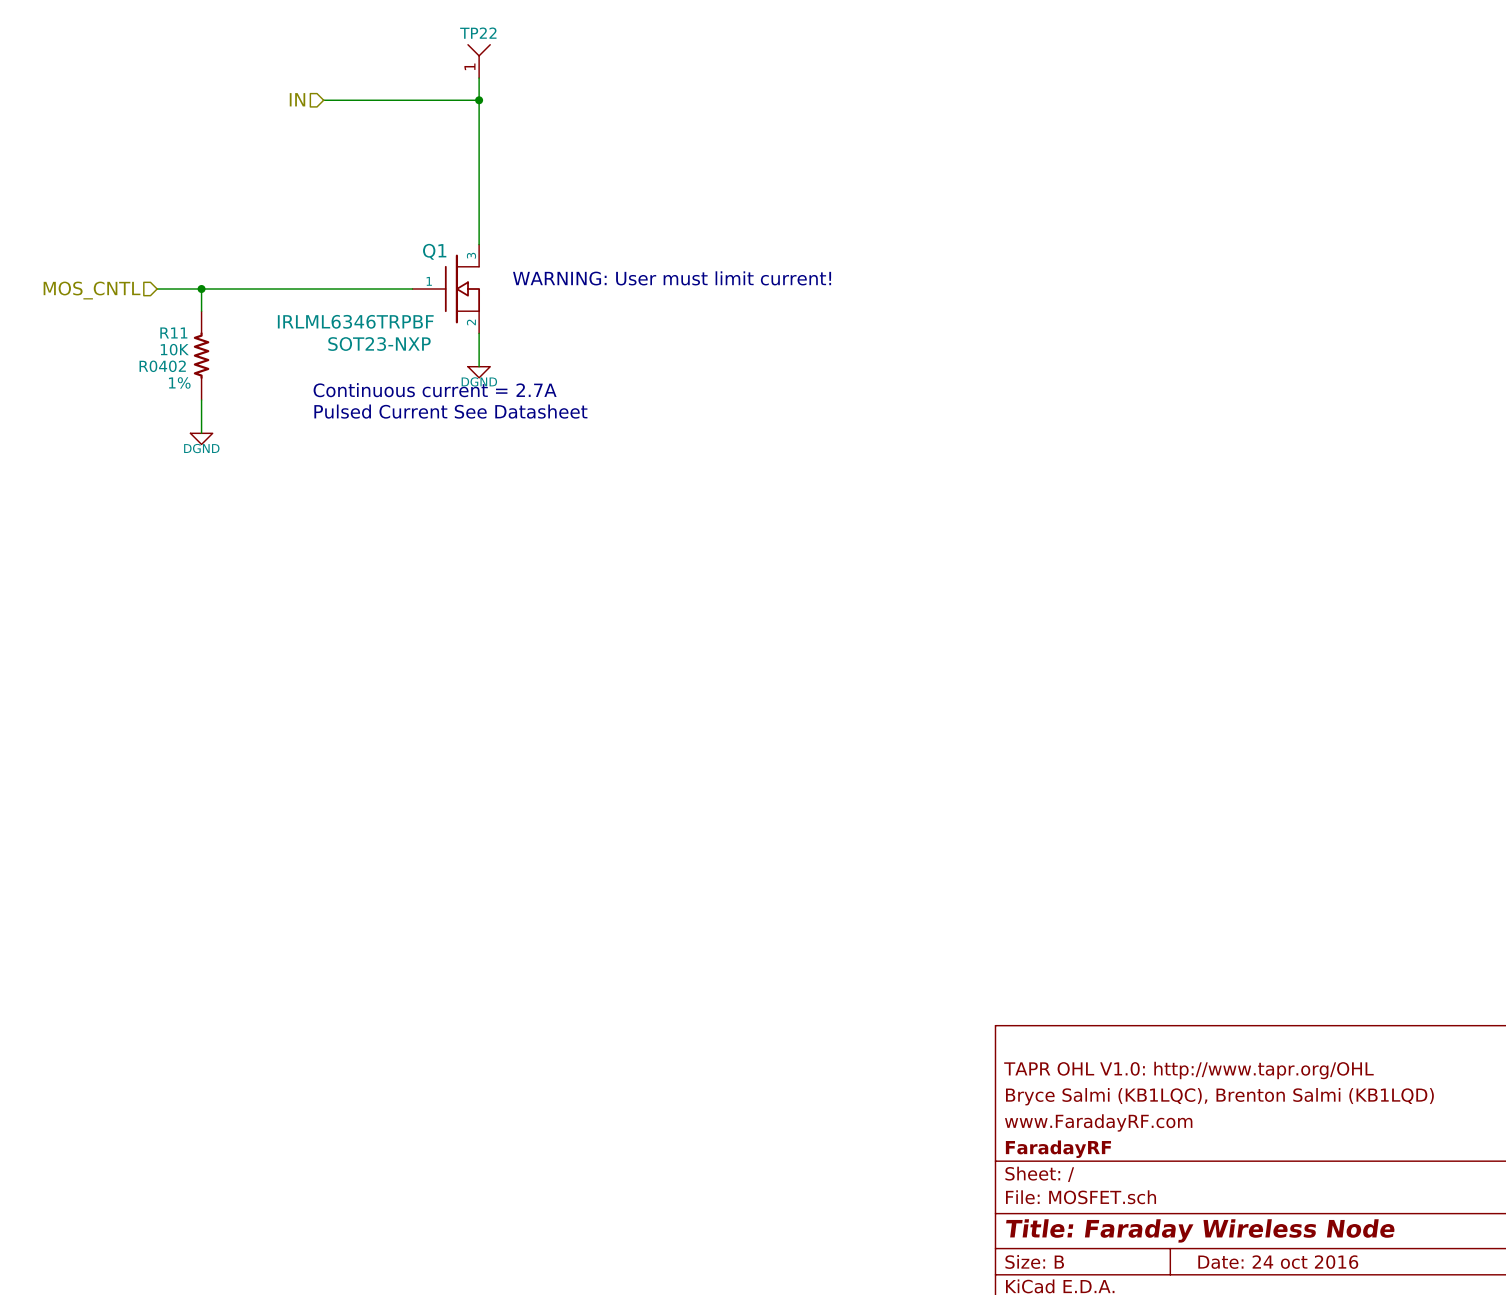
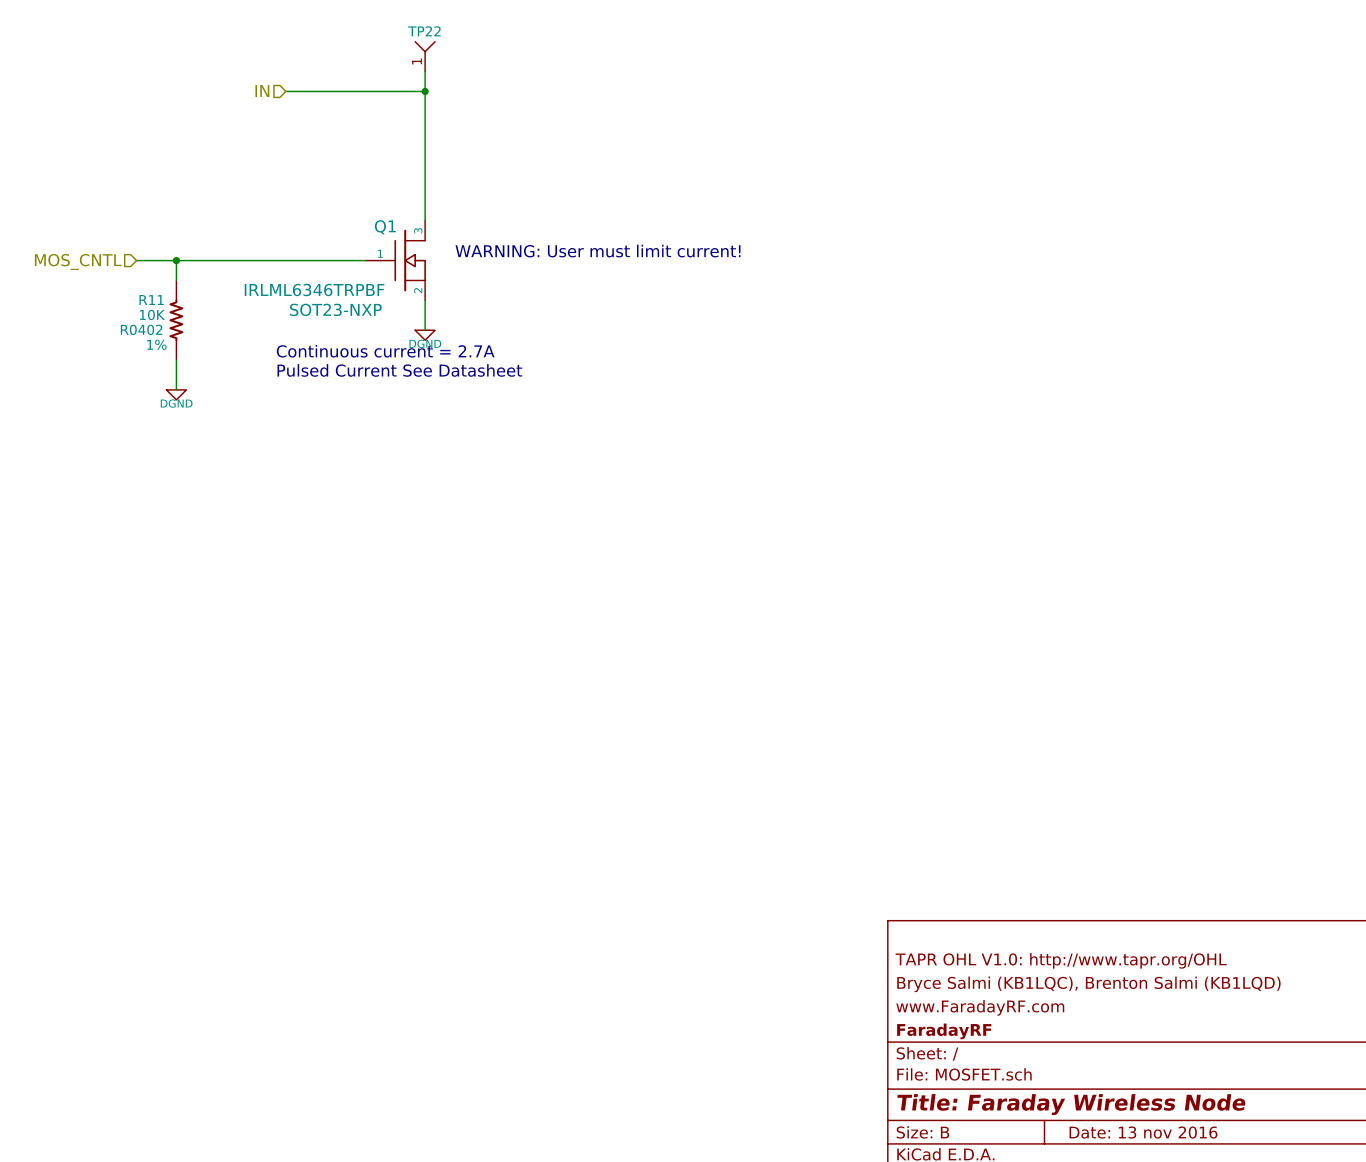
title block: Date: 24 oct 2016 (1278, 1262) -> Date: 13 nov 2016 (1143, 1132)

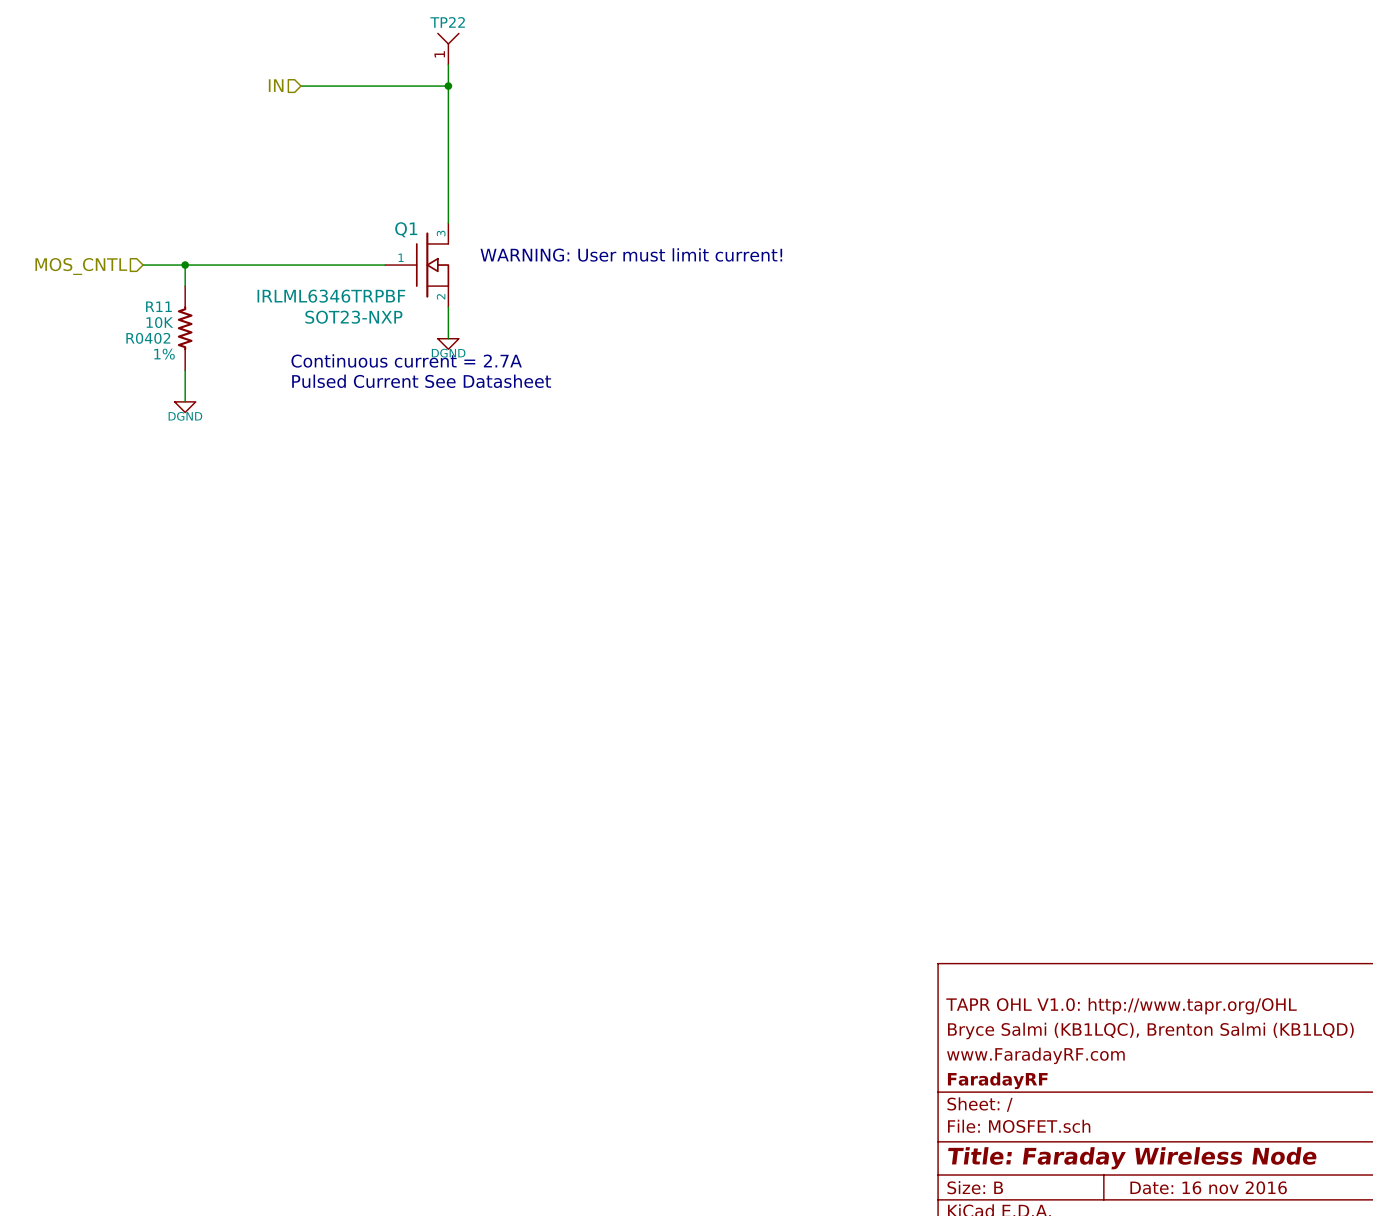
title block: Date: 13 nov 2016 (1143, 1132) -> Date: 16 nov 2016 (1208, 1187)

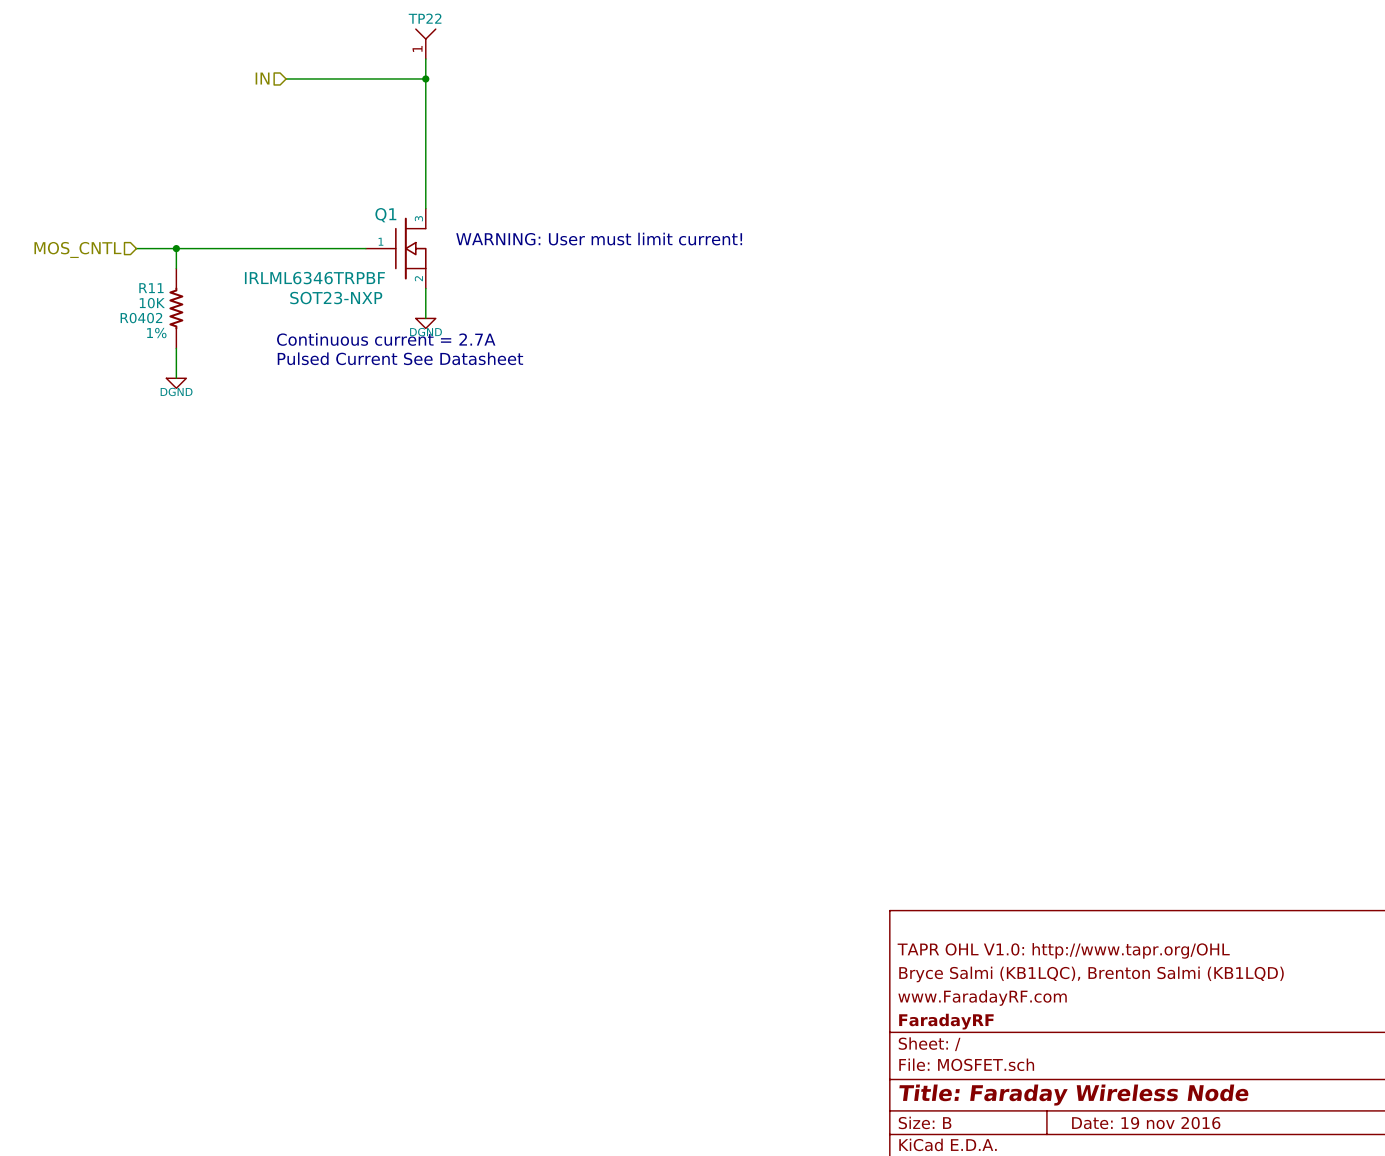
title block: Date: 16 nov 2016 (1208, 1187) -> Date: 19 nov 2016 (1146, 1123)

